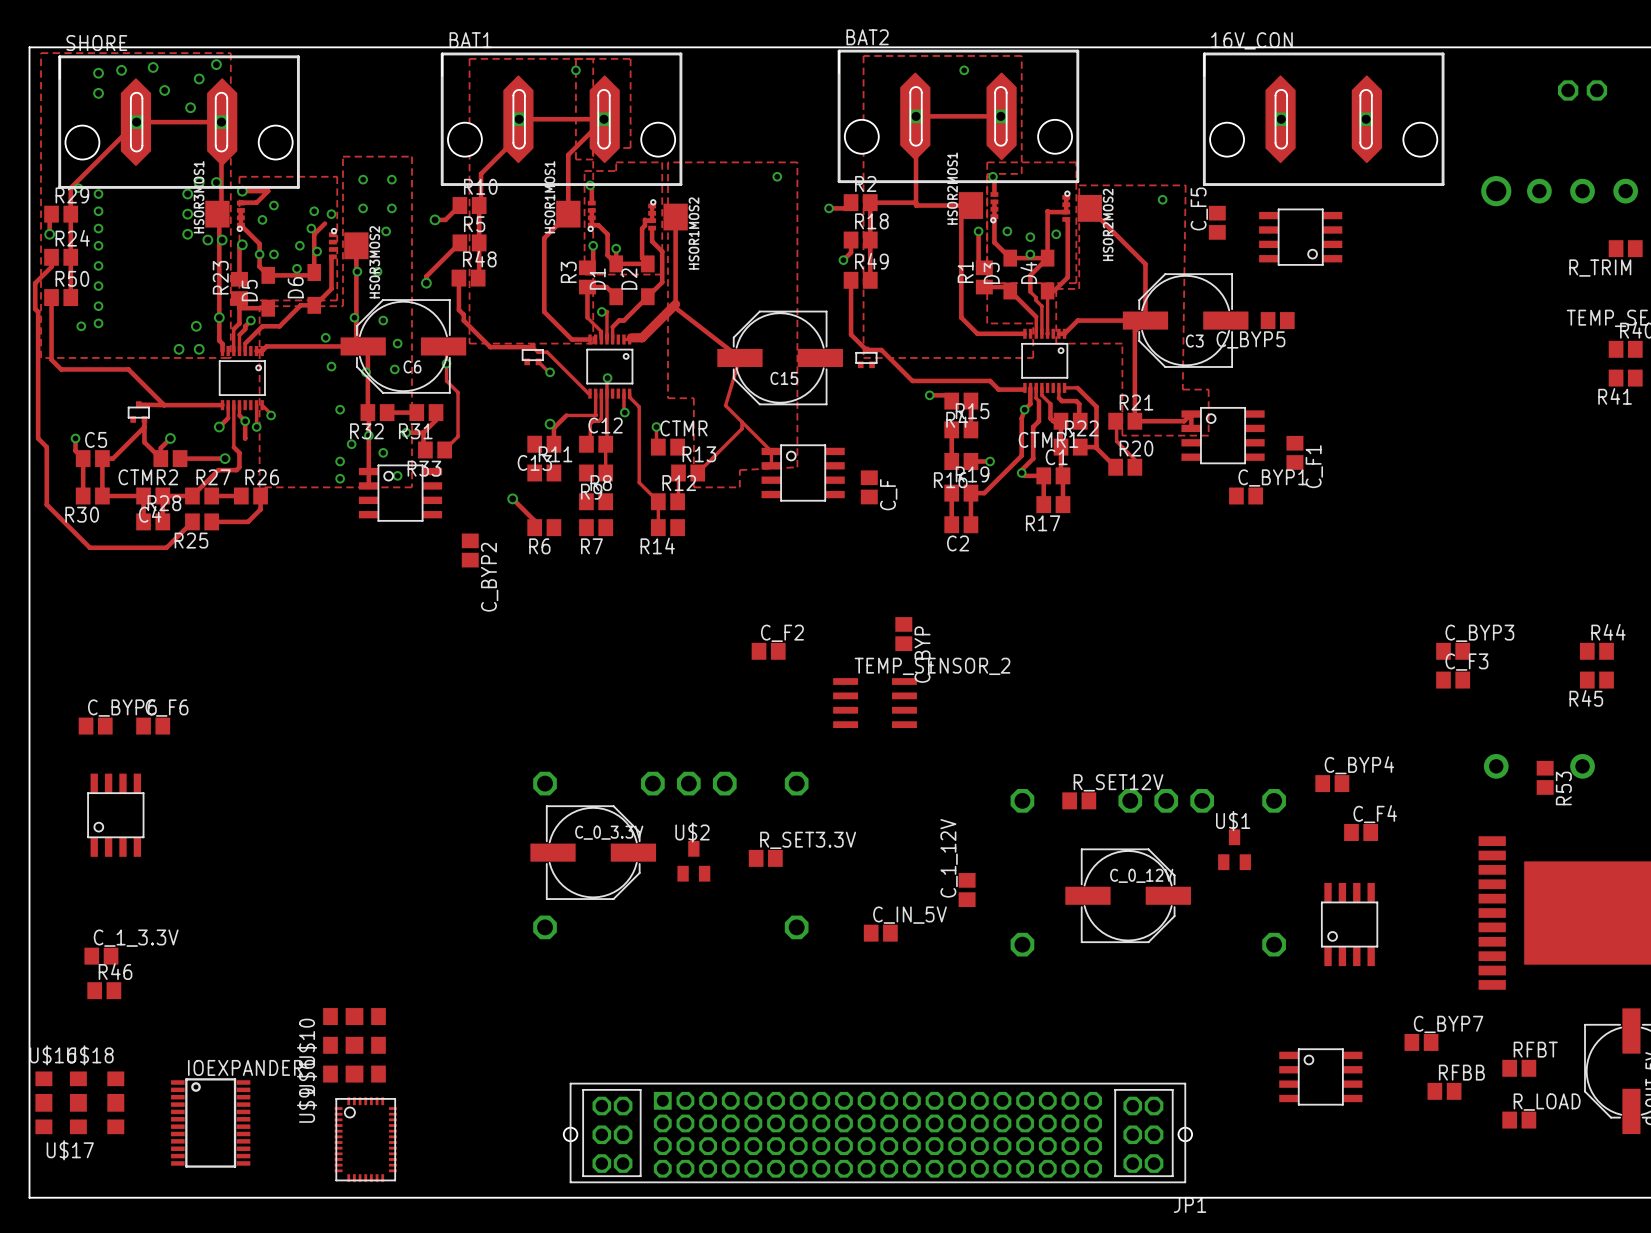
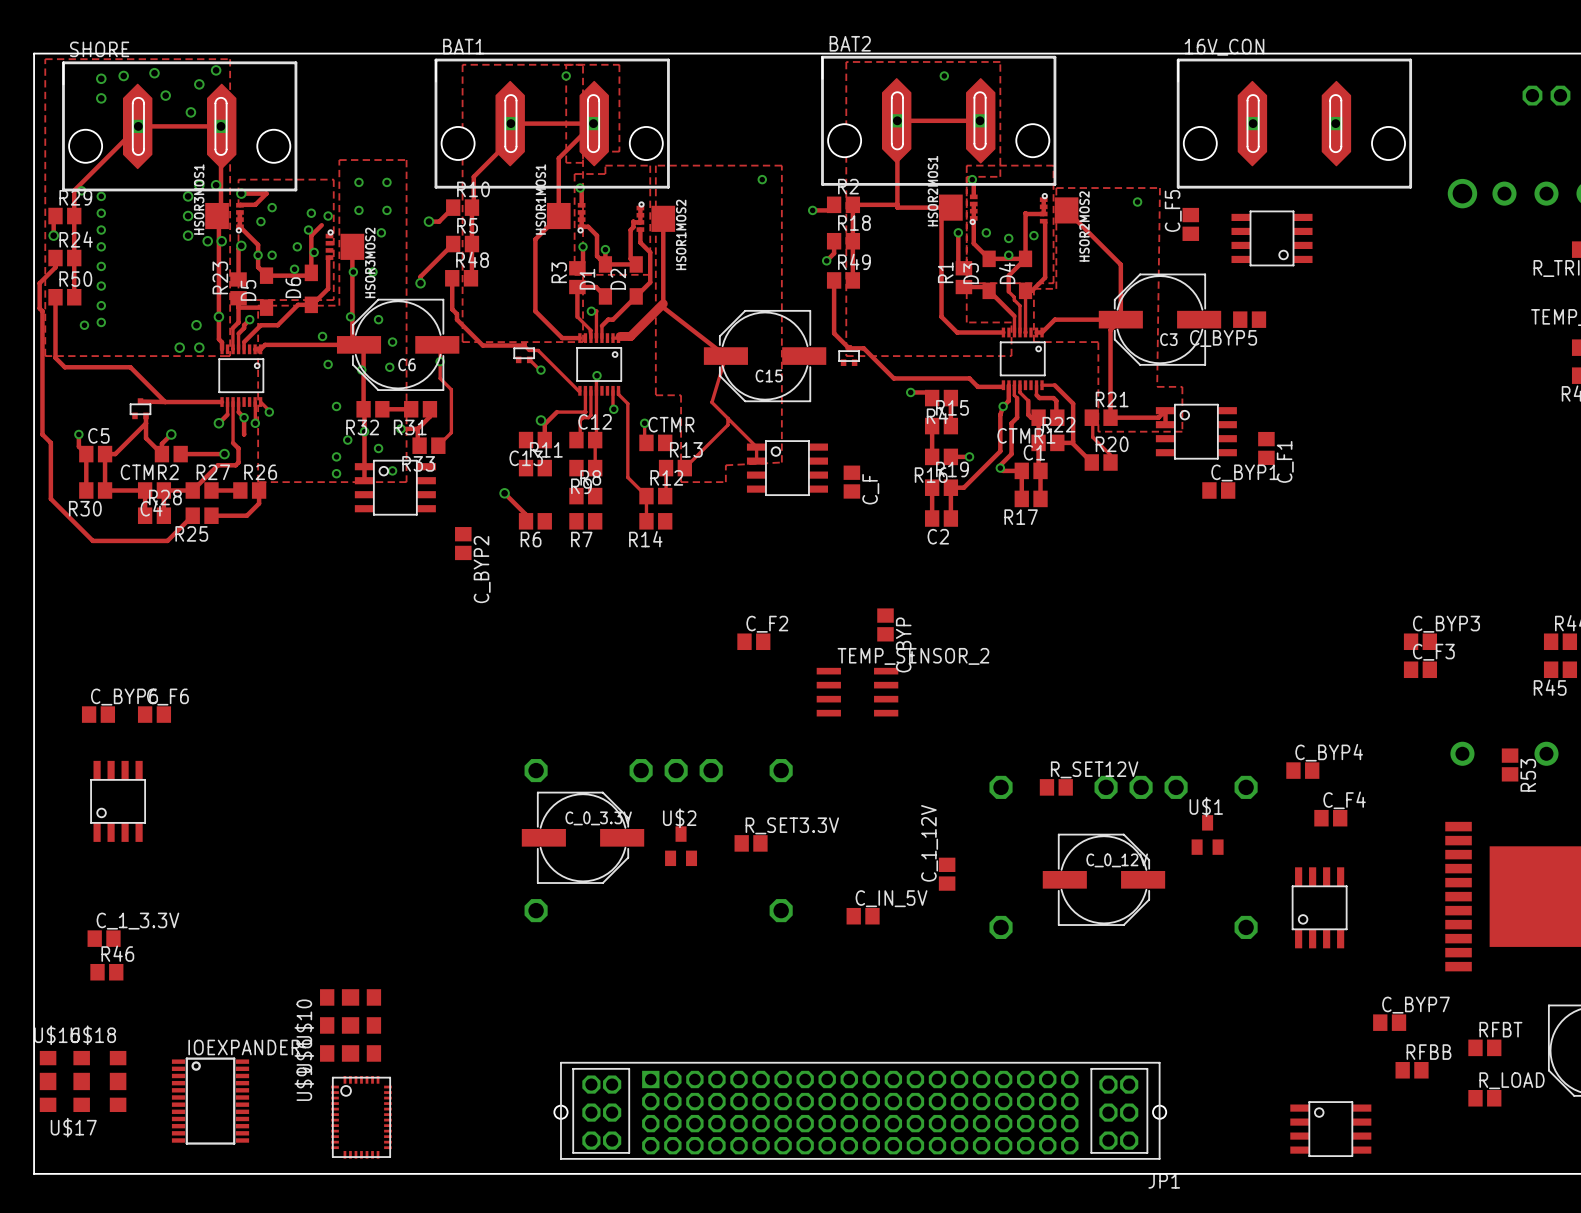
part position: (1320, 1076) -> (1330, 1129)

